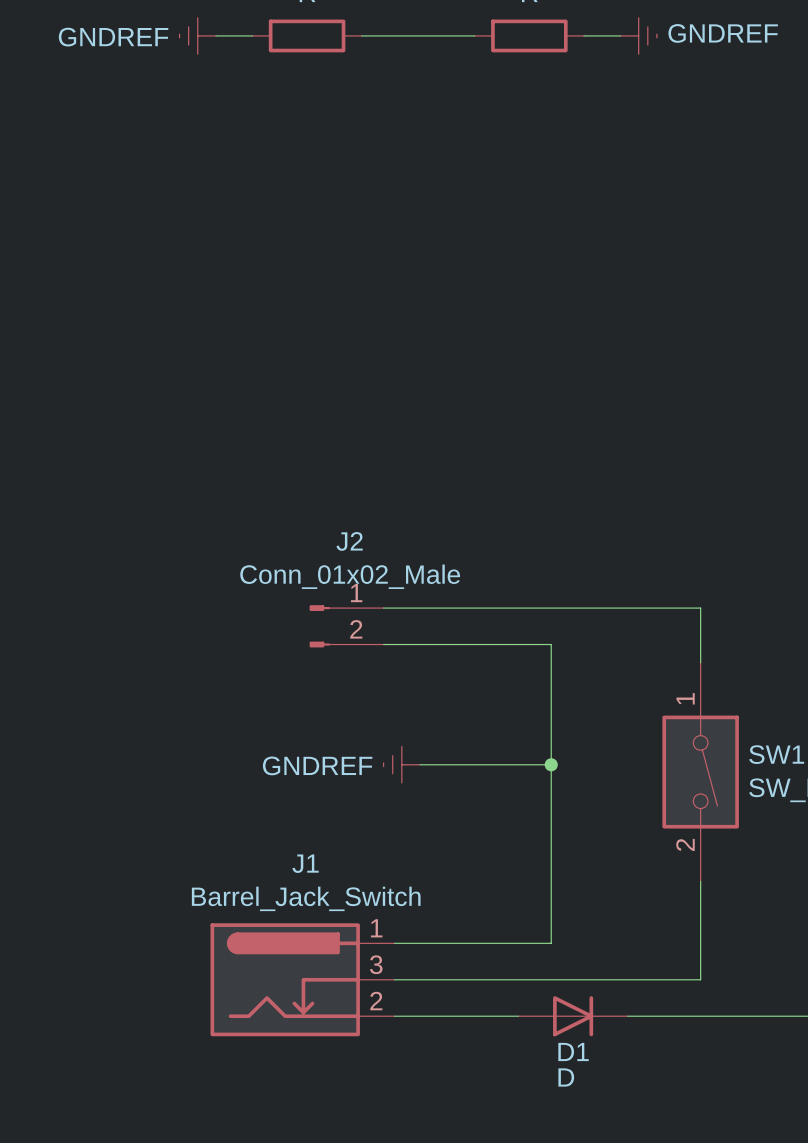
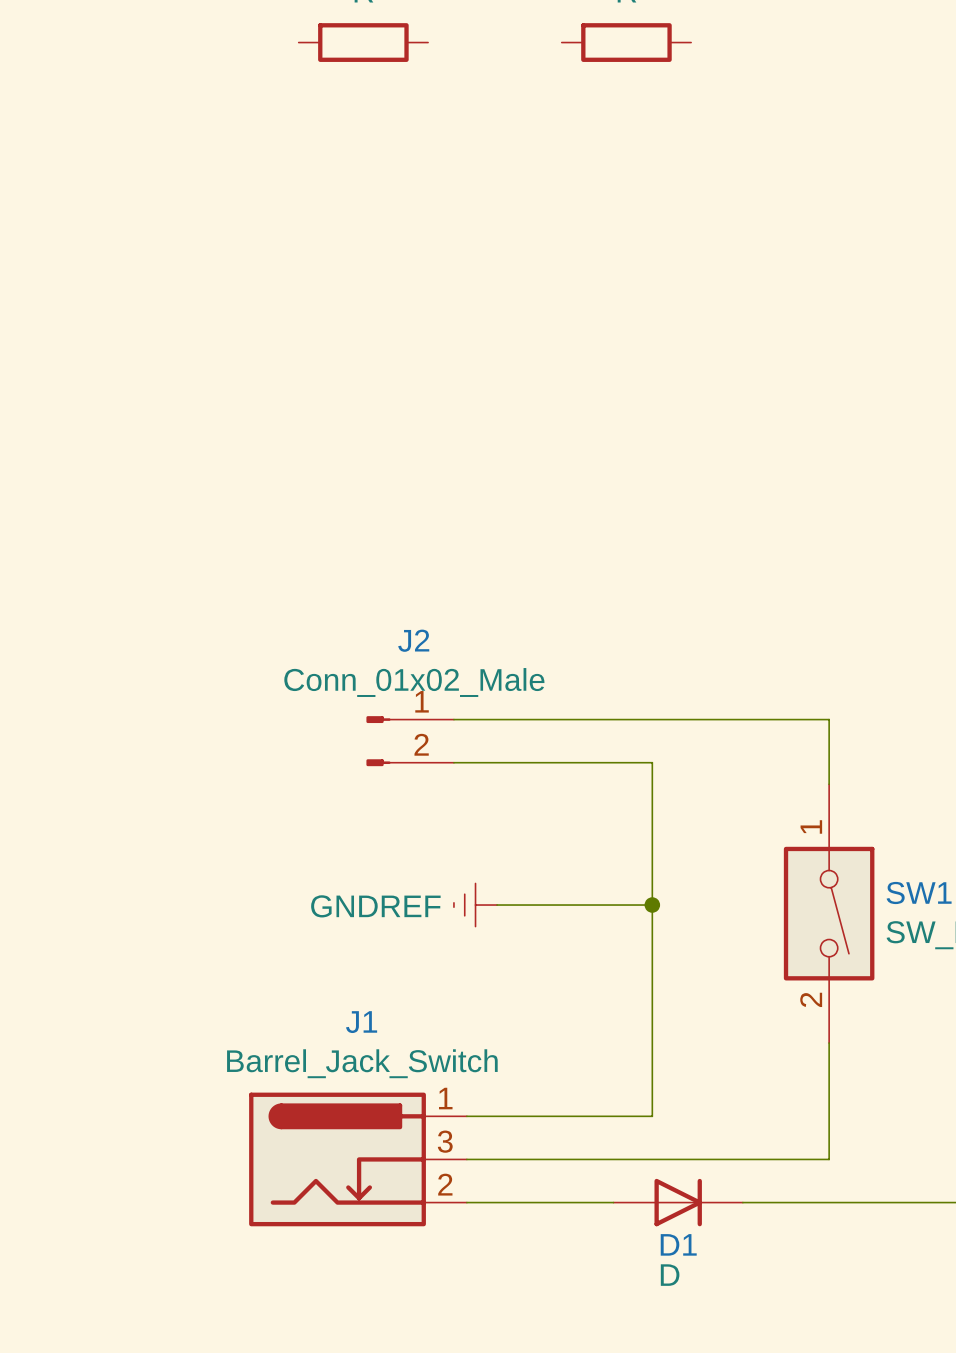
power symbol: GNDREF (197, 35) -> none
wire: (215, 35) (252, 35) -> none
wire: (361, 35) (474, 35) -> none
wire: (584, 35) (620, 35) -> none
power symbol: GNDREF (638, 35) -> none

